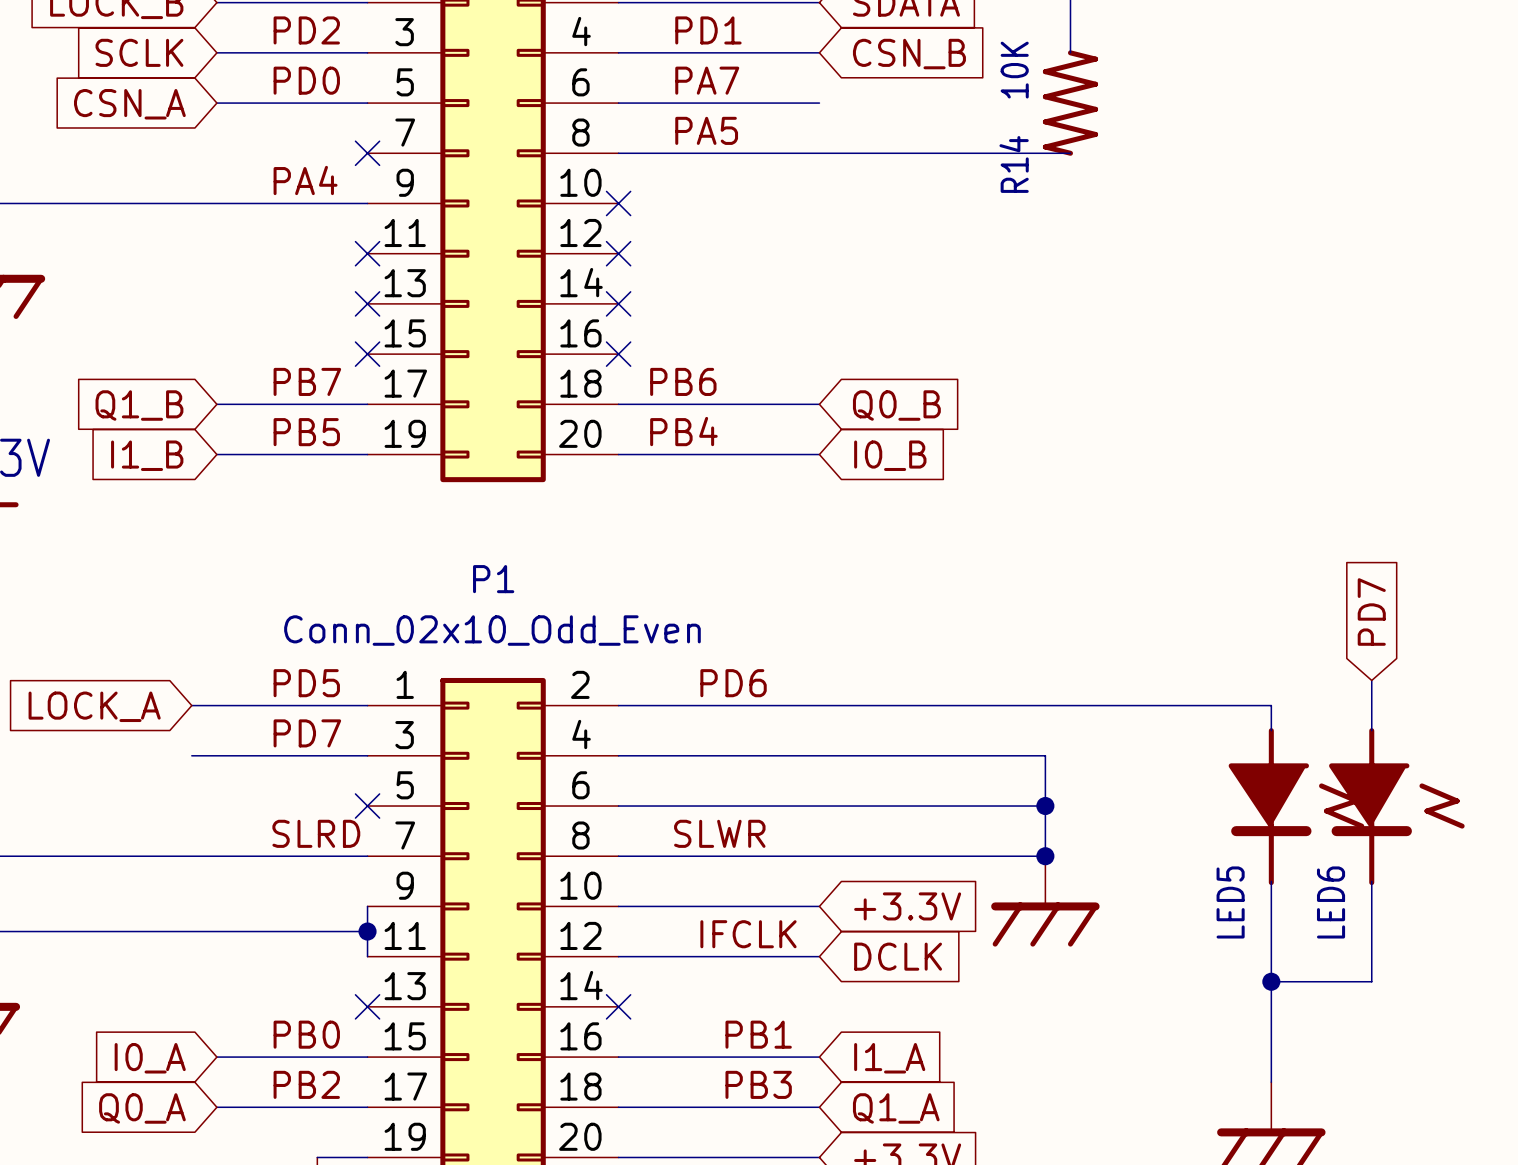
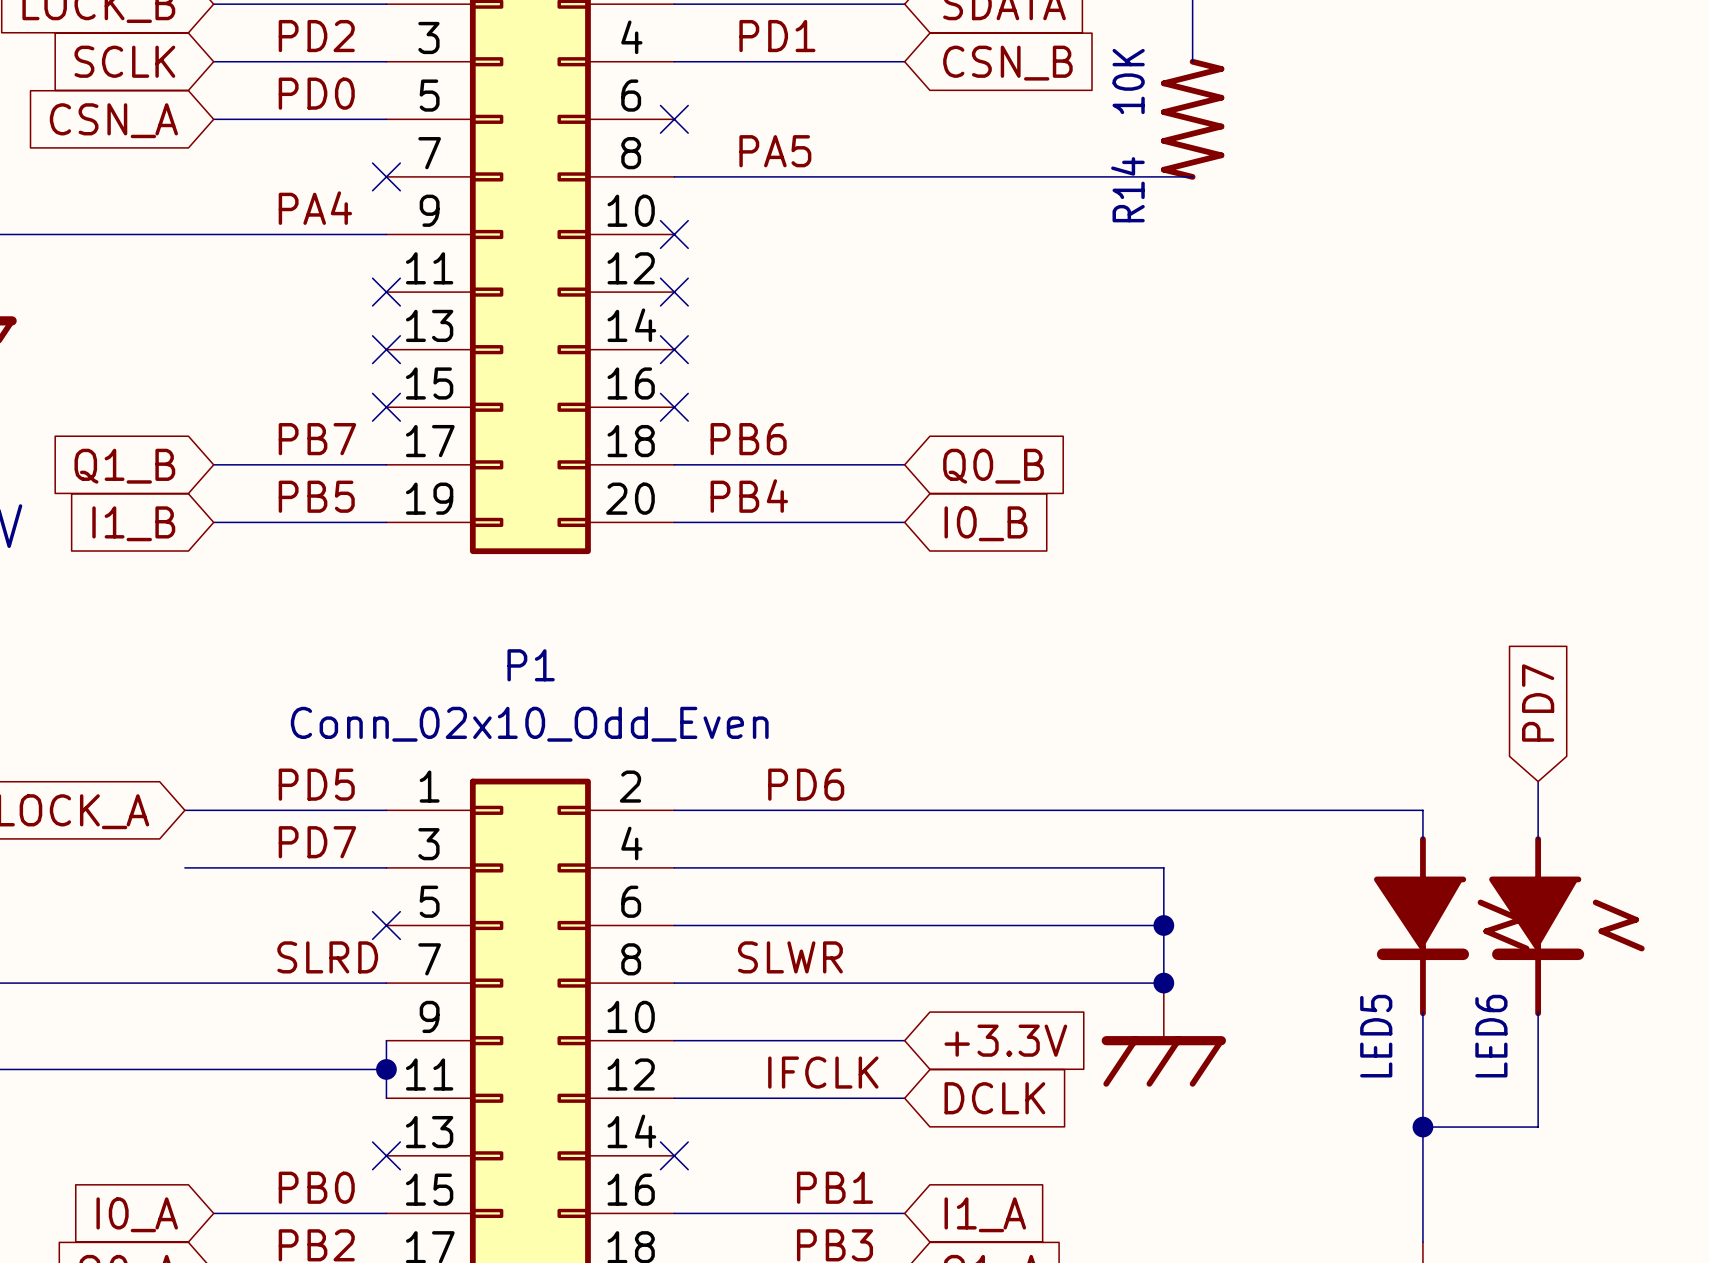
label: PA7 (707, 80) -> none
wire: (618, 103) (819, 103) -> none
no-connect mark: none -> (674, 119)

